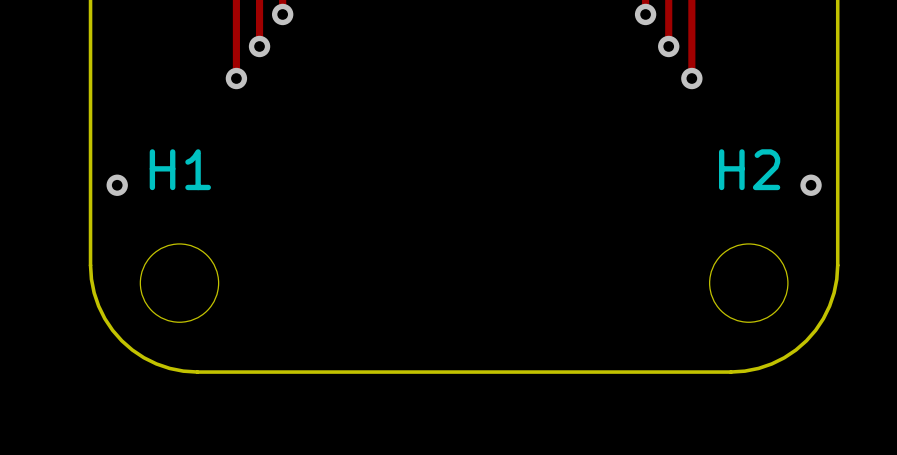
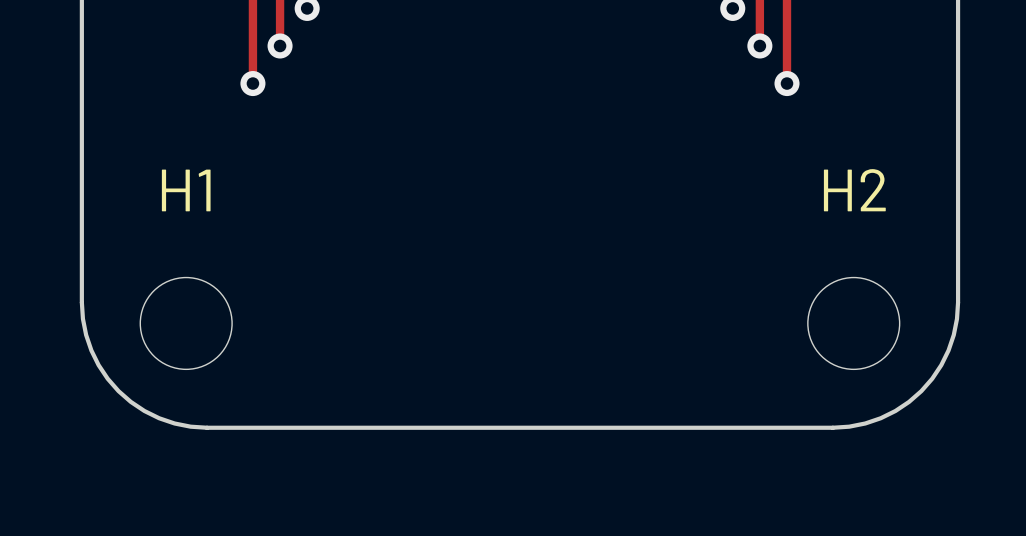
via: (117, 185) -> none
via: (811, 185) -> none

